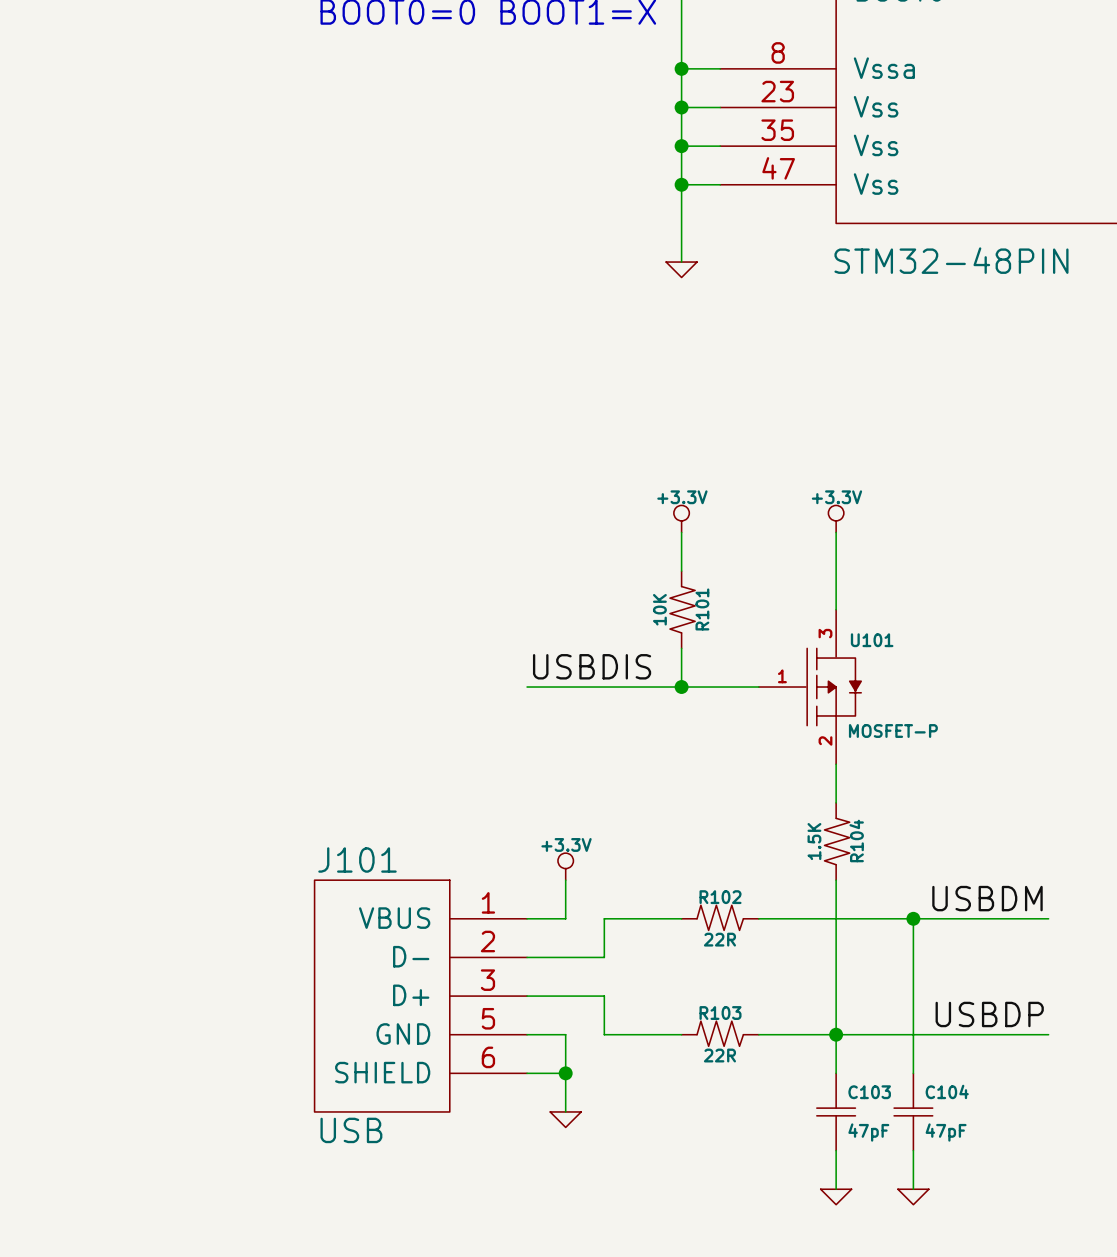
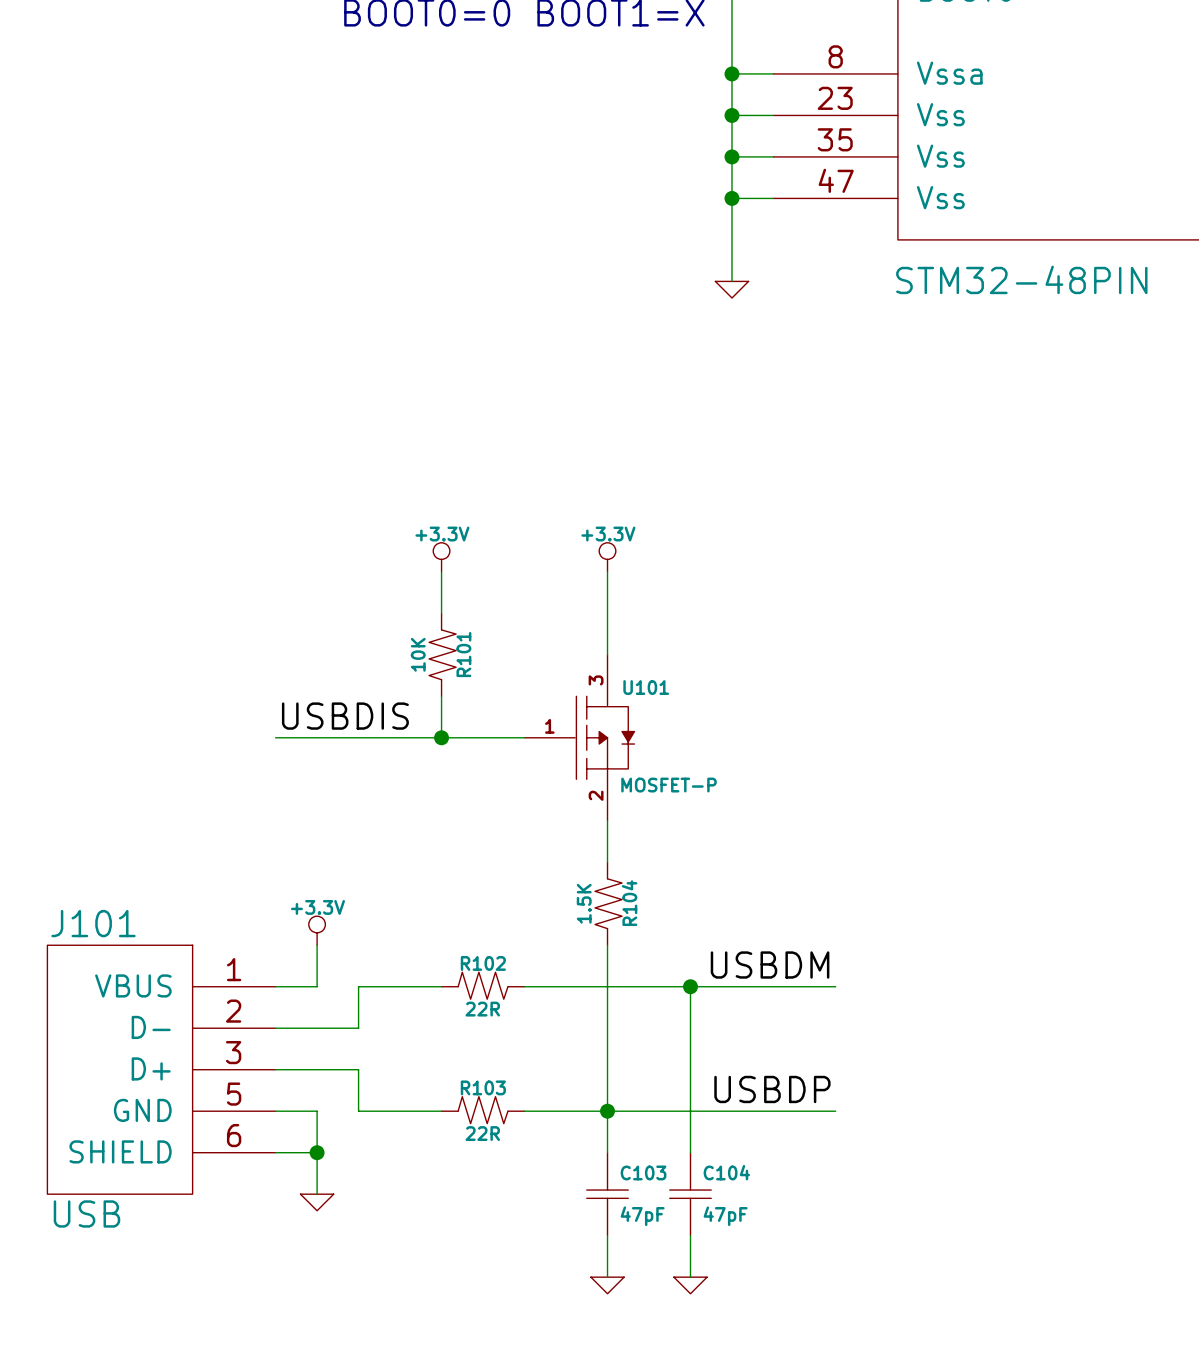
power symbol: none -> +3.3V (441, 557)
power symbol position: +3.3V (681, 518) -> +3.3V (607, 557)
power symbol: +3.3V (836, 518) -> none
wire: (681, 532) (681, 571) -> (441, 571) (441, 613)
wire: (836, 532) (836, 609) -> (607, 571) (607, 654)
R101 position: (682, 609) -> (442, 654)
wire: (681, 648) (681, 687) -> (441, 696) (441, 737)
label position: USBDIS (592, 666) -> USBDIS (345, 716)
junction: none -> (441, 737)
wire: (527, 687) (758, 687) -> (275, 737) (524, 737)
junction: (681, 687) -> none
U101 position: (810, 687) -> (579, 737)
wire: (836, 764) (836, 802) -> (607, 820) (607, 862)
R104 position: (837, 841) -> (608, 903)
power symbol: none -> +3.3V (317, 930)
power symbol: +3.3V (565, 866) -> none
wire: none -> (317, 945) (317, 986) (275, 986)
wire: (836, 880) (836, 1073) -> none
label position: USBDM (987, 898) -> USBDM (770, 965)
R102 position: (720, 917) -> (483, 985)
wire: none -> (441, 986) (358, 986) (358, 1028) (275, 1028)
wire: (604, 918) (604, 957) (527, 957) -> none
junction: none -> (690, 986)
wire: (778, 918) (1048, 918) -> none
wire: (913, 918) (913, 1073) -> (690, 986) (690, 1152)
junction: (913, 918) -> none
wire: none -> (275, 1069) (358, 1069) (358, 1111) (441, 1111)
J101 position: (420, 996) -> (161, 1069)
wire: (527, 996) (604, 996) (604, 1034) -> (649, 986) (607, 986) (607, 1111) (649, 1111)
label position: USBDP (989, 1014) -> USBDP (772, 1089)
R103 position: (720, 1033) -> (483, 1110)
wire: none -> (275, 1111) (317, 1111) (317, 1194)
wire: (778, 1034) (1048, 1034) -> none
junction: (836, 1034) -> none
wire: none -> (275, 1152) (317, 1152)
junction: none -> (317, 1152)
wire: (527, 1073) (565, 1073) (565, 1111) -> none
junction position: (565, 1073) -> (607, 1111)
C103 position: (836, 1111) -> (607, 1194)
C104 position: (913, 1111) -> (690, 1194)
power symbol: none -> (317, 1202)
power symbol: (565, 1119) -> none
wire: (836, 1150) (836, 1189) -> (607, 1235) (607, 1277)
wire: (913, 1150) (913, 1189) -> (690, 1235) (690, 1277)
power symbol: none -> (607, 1285)
power symbol: none -> (690, 1285)
power symbol: (836, 1196) -> none
power symbol: (913, 1196) -> none

